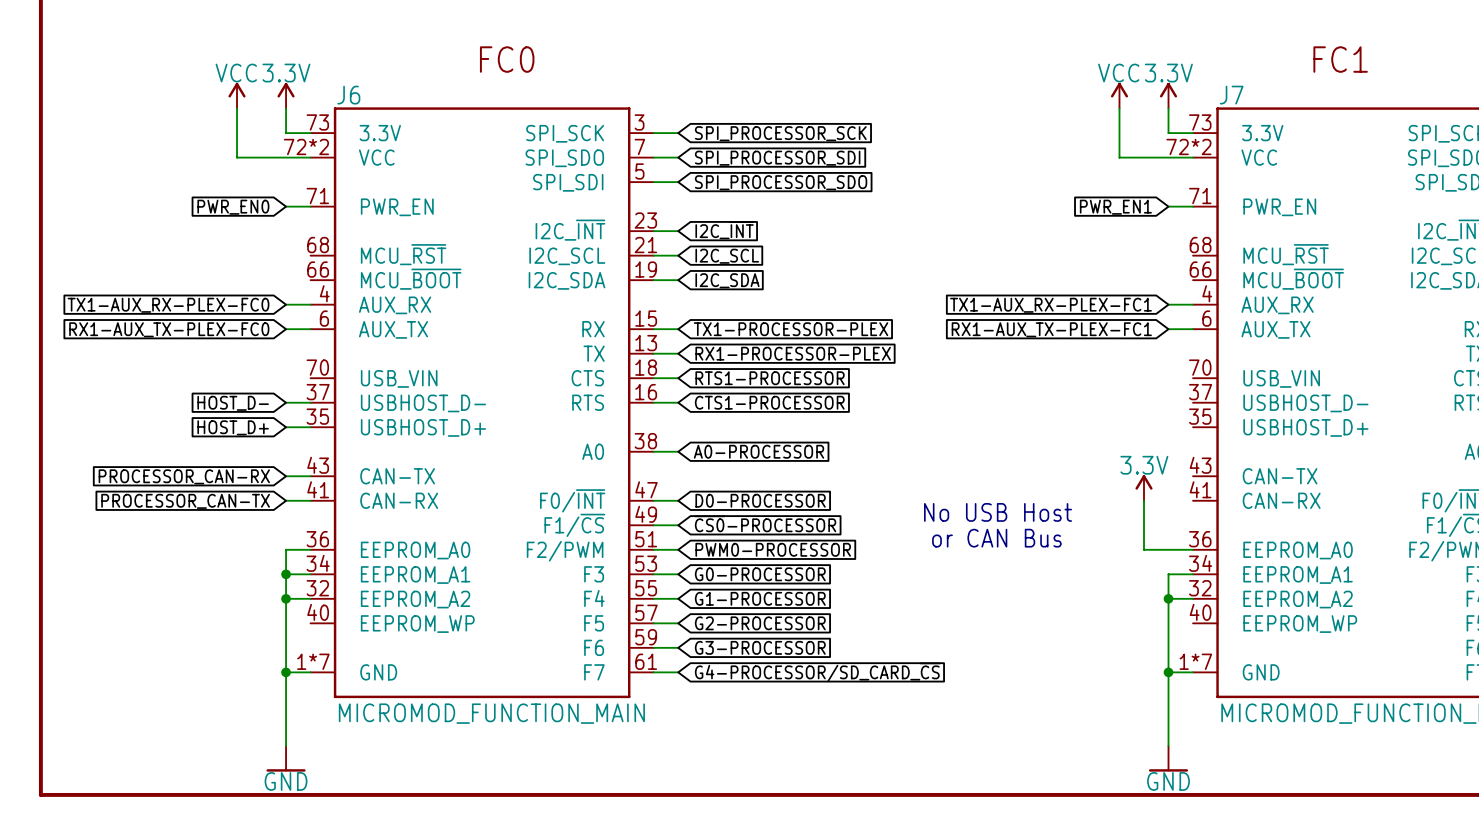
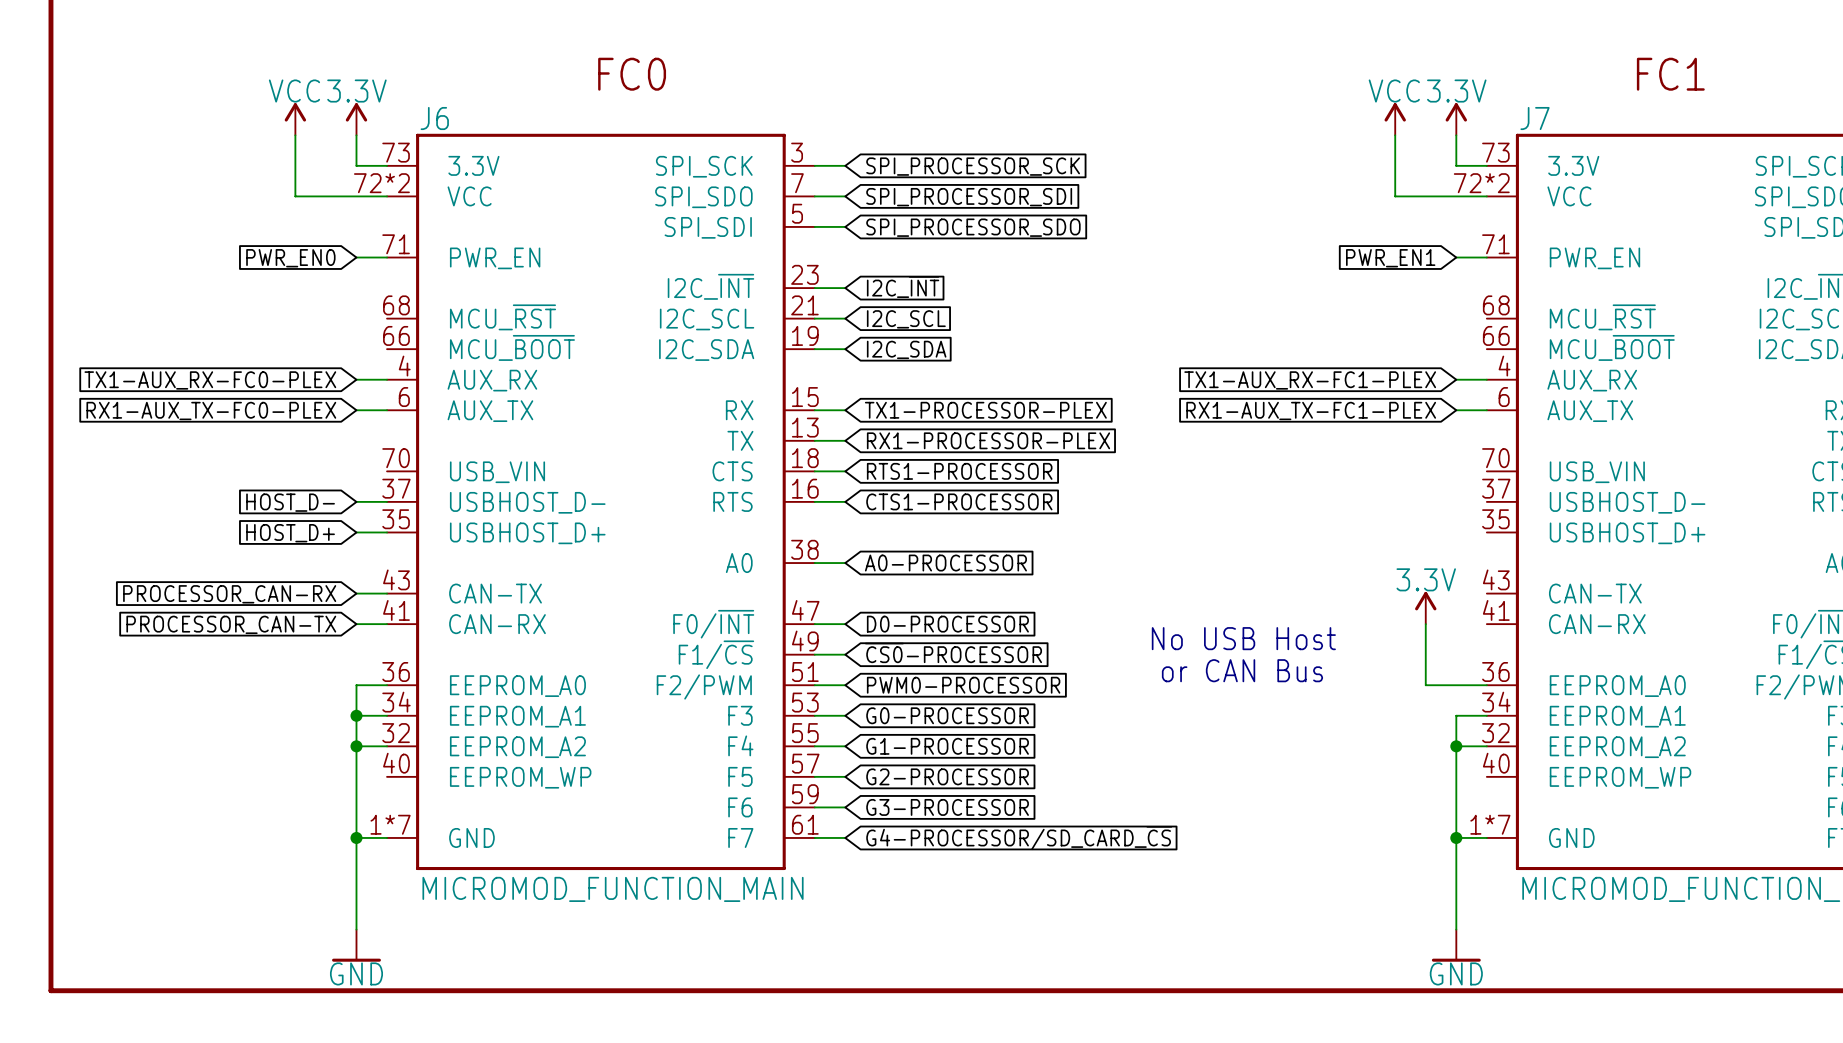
global label: TX1-AUX_RX-PLEX-FC0 (168, 305) -> TX1-AUX_RX-FC0-PLEX (210, 380)
global label: TX1-AUX_RX-PLEX-FC1 (1050, 305) -> TX1-AUX_RX-FC1-PLEX (1310, 380)
global label: RX1-AUX_TX-PLEX-FC0 (169, 329) -> RX1-AUX_TX-FC0-PLEX (211, 411)
global label: RX1-AUX_TX-PLEX-FC1 (1051, 329) -> RX1-AUX_TX-FC1-PLEX (1311, 411)

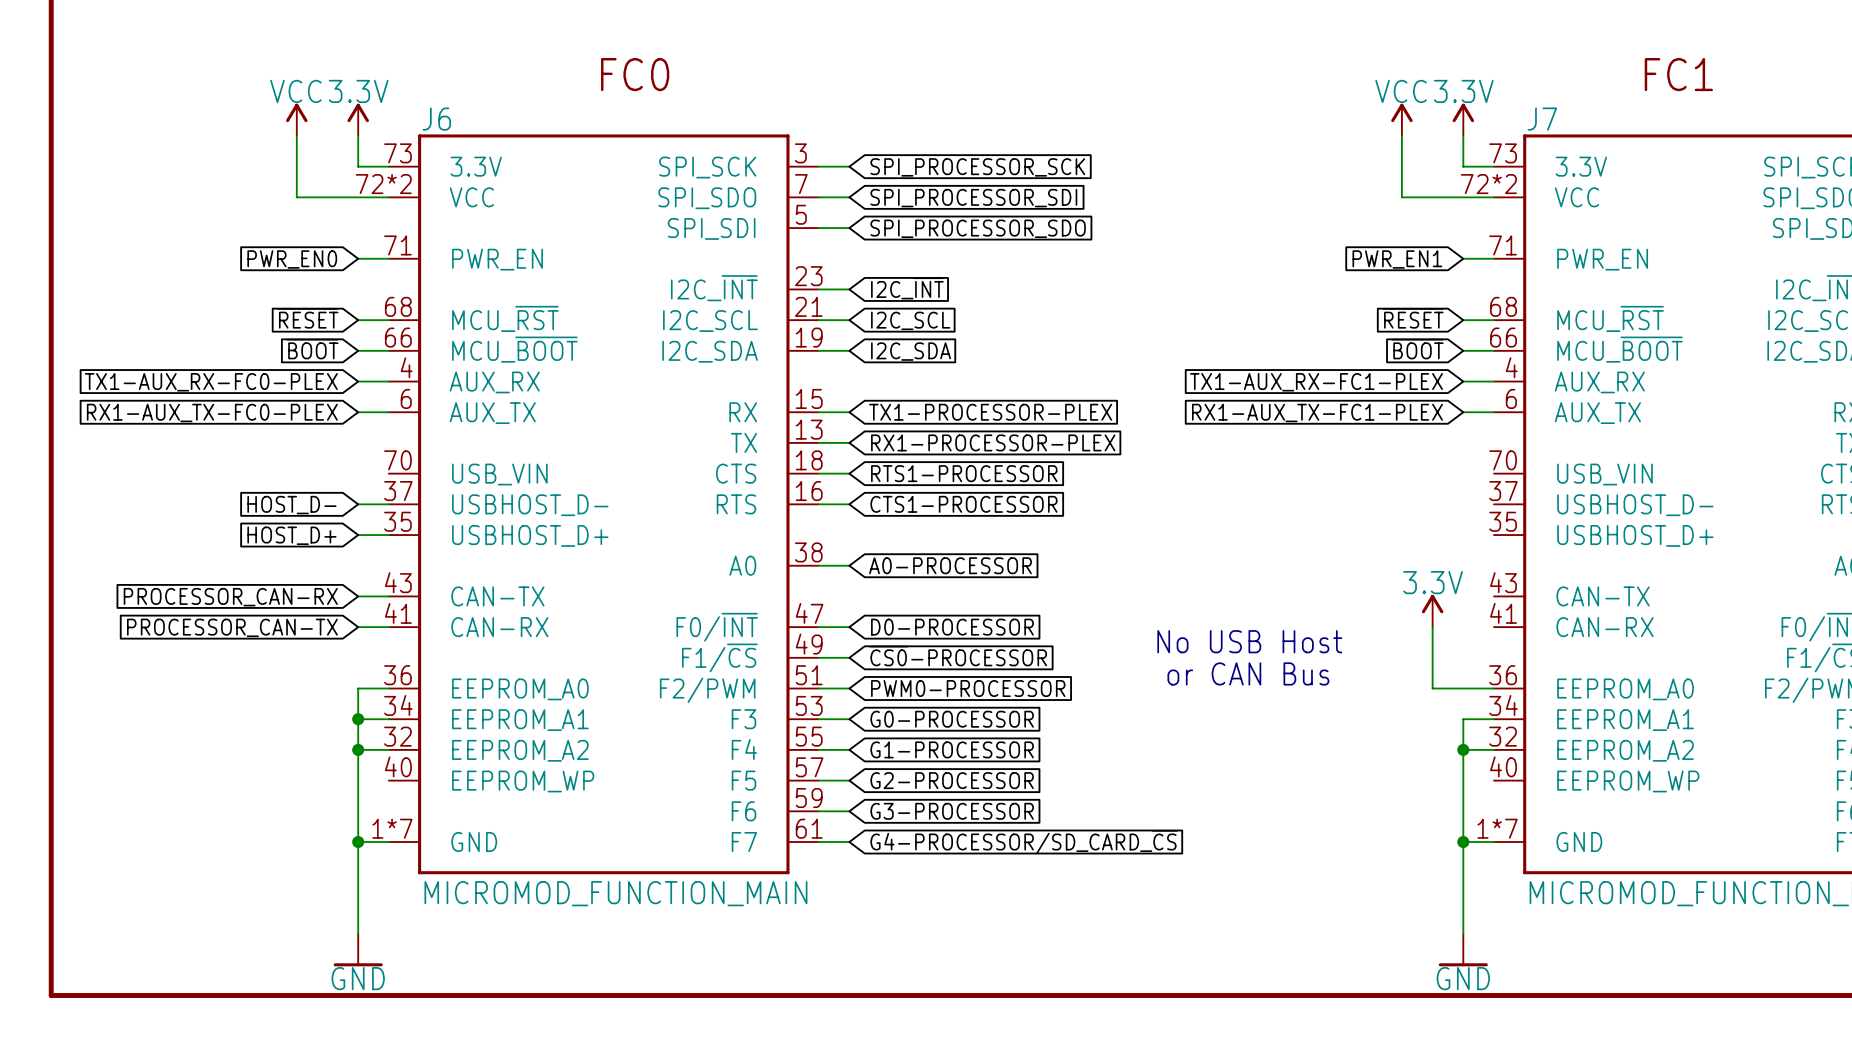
global label: none -> ~{RESET} (307, 318)
global label: none -> ~{RESET} (1412, 318)
wire: none -> (358, 320) (388, 320)
wire: none -> (1463, 320) (1494, 320)
global label: none -> ~{BOOT} (312, 349)
global label: none -> ~{BOOT} (1417, 349)
wire: none -> (358, 350) (388, 350)
wire: none -> (1463, 350) (1494, 350)

